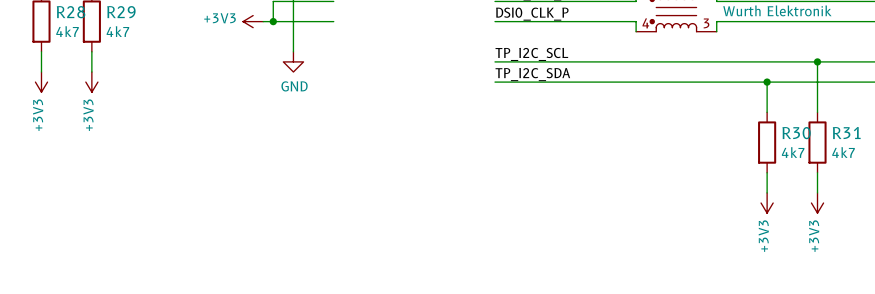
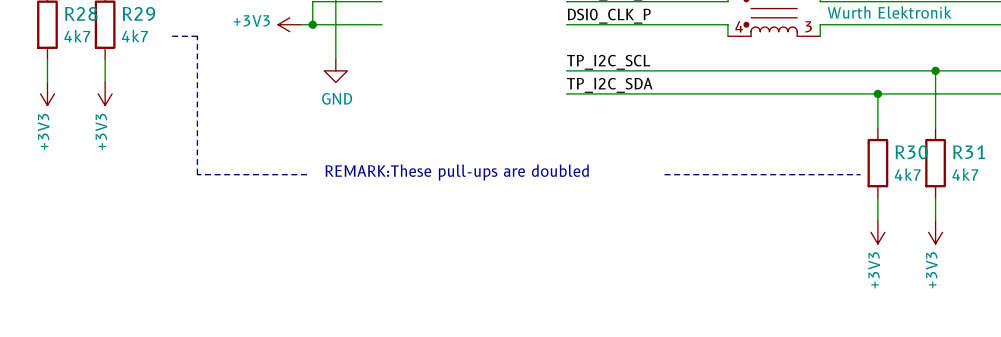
line: none -> (168, 36) (197, 36) (197, 174) (306, 174)
text: none -> REMARK:These pull-ups are doubled (457, 172)
line: none -> (664, 174) (860, 174)

